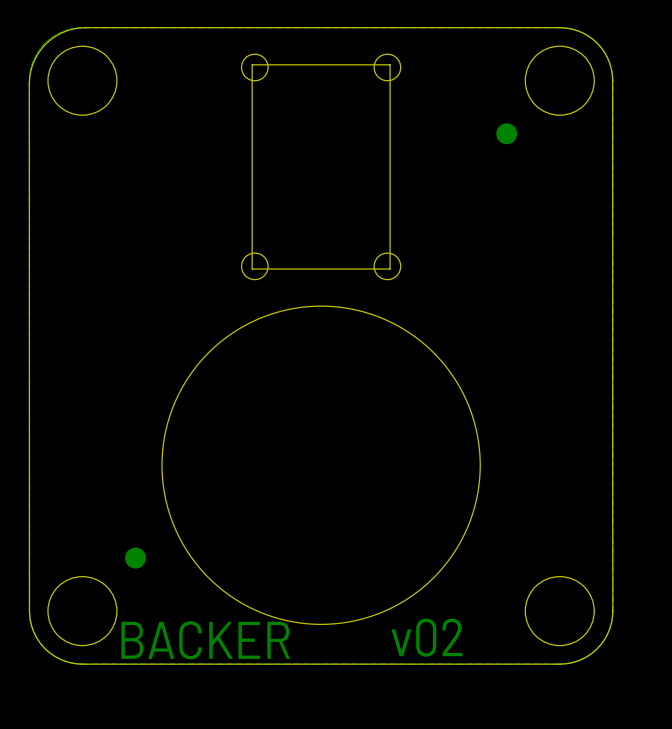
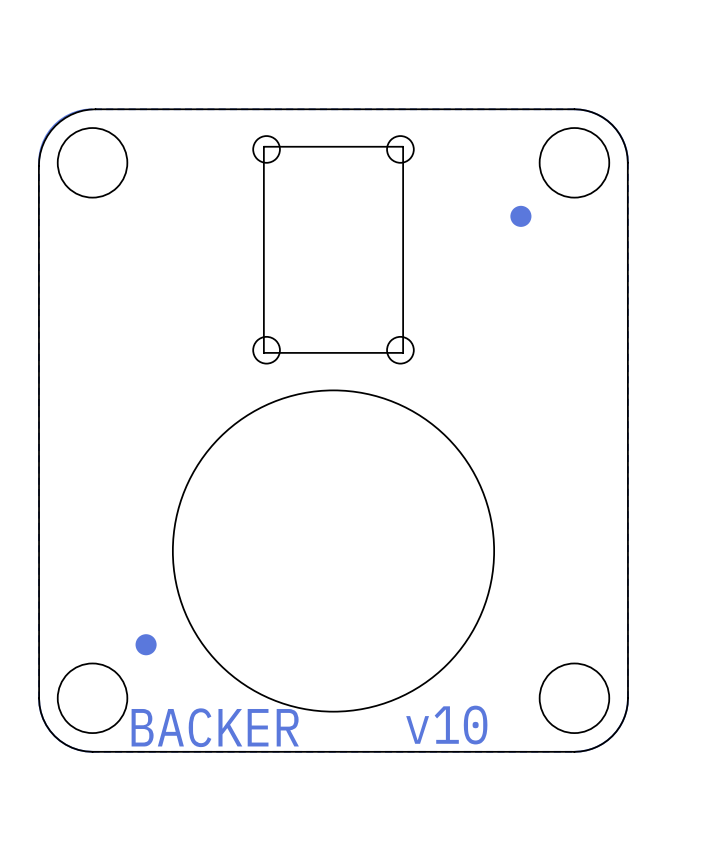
text: v02 (427, 637) -> v10 (446, 725)

